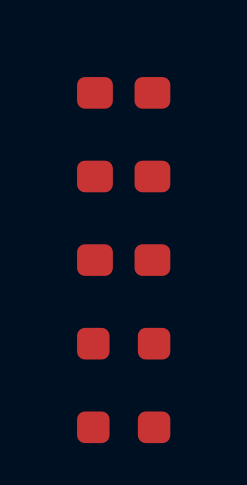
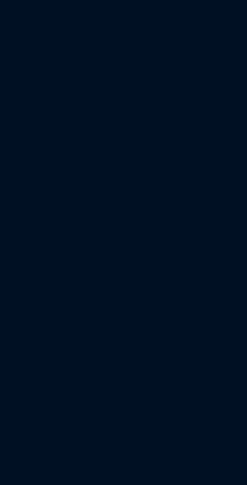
part: (123, 92) -> none
part: (123, 176) -> none
part: (123, 260) -> none
part: (123, 343) -> none
part: (123, 427) -> none

